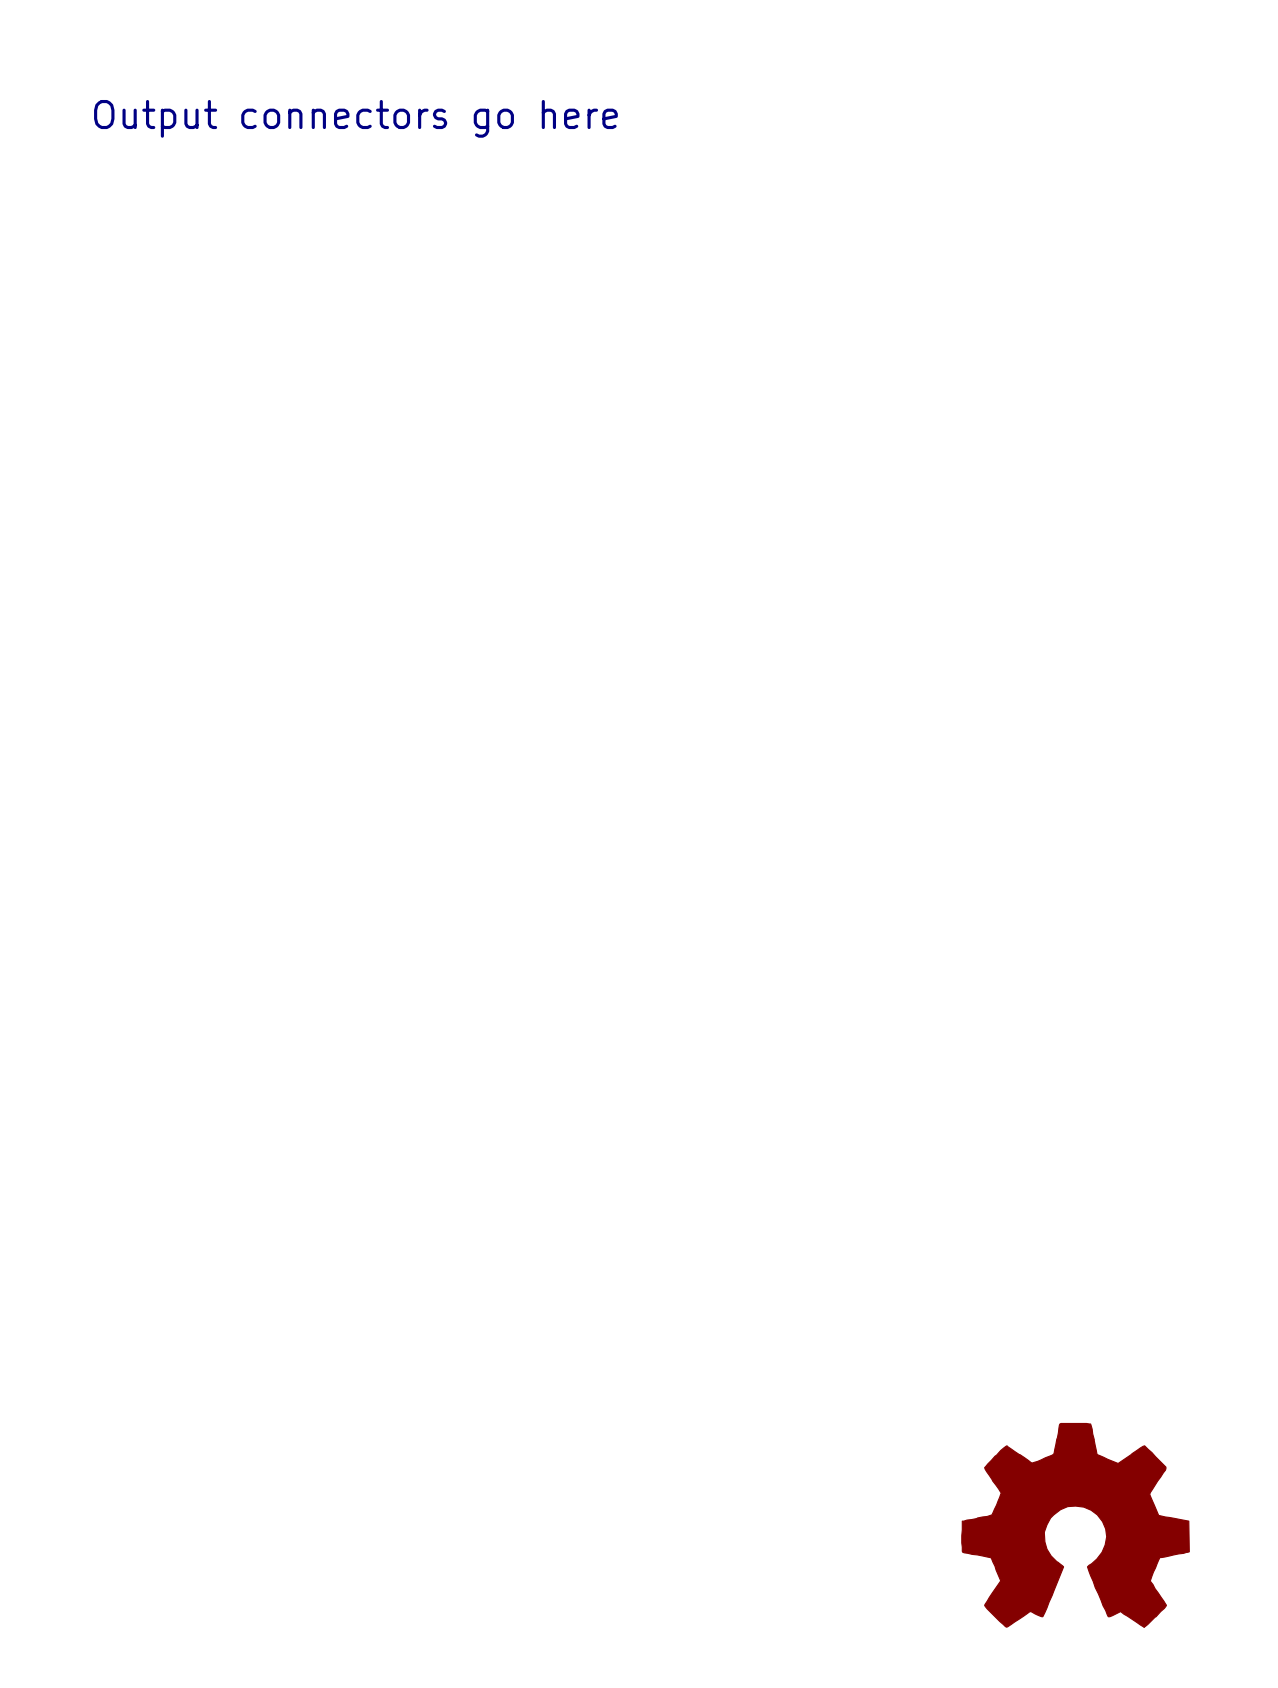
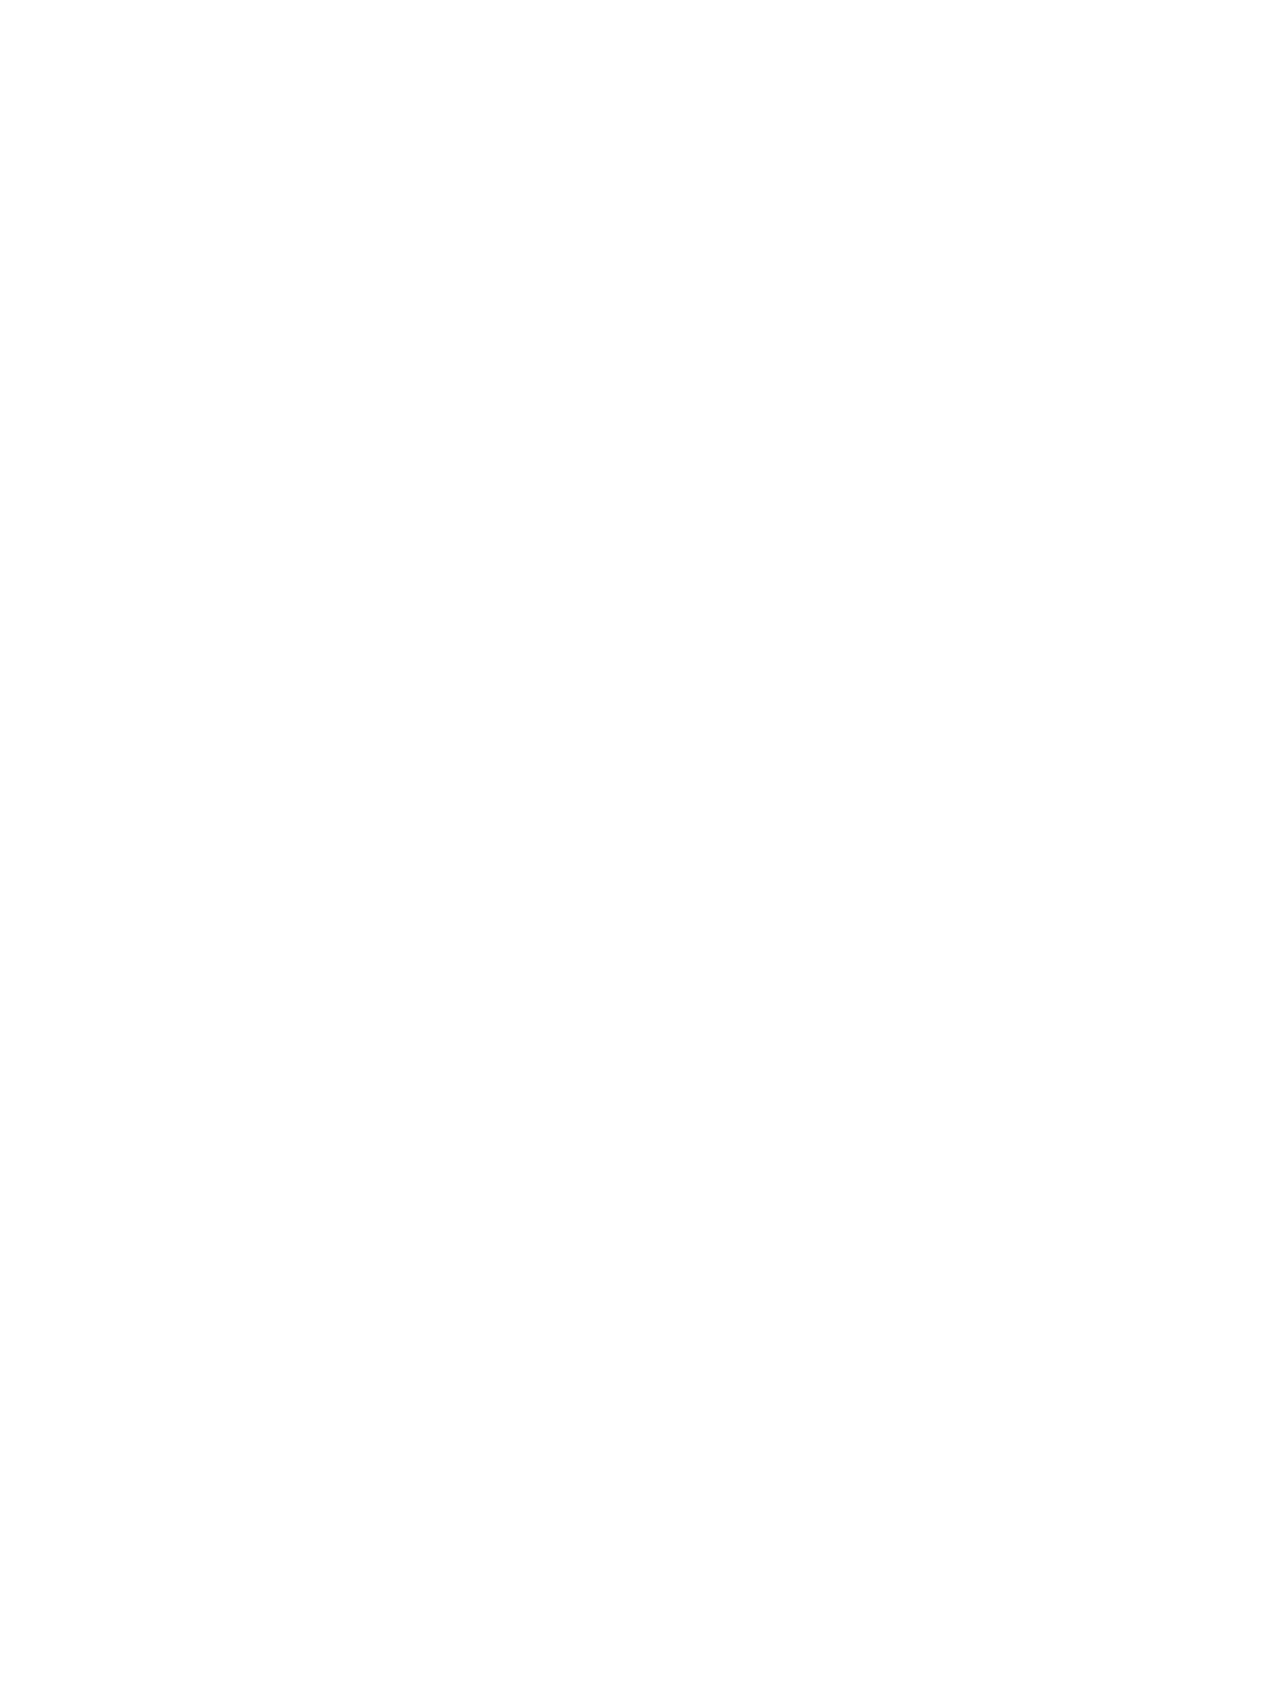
text: Output connectors go here (355, 118) -> none
part: (1075, 1525) -> none

